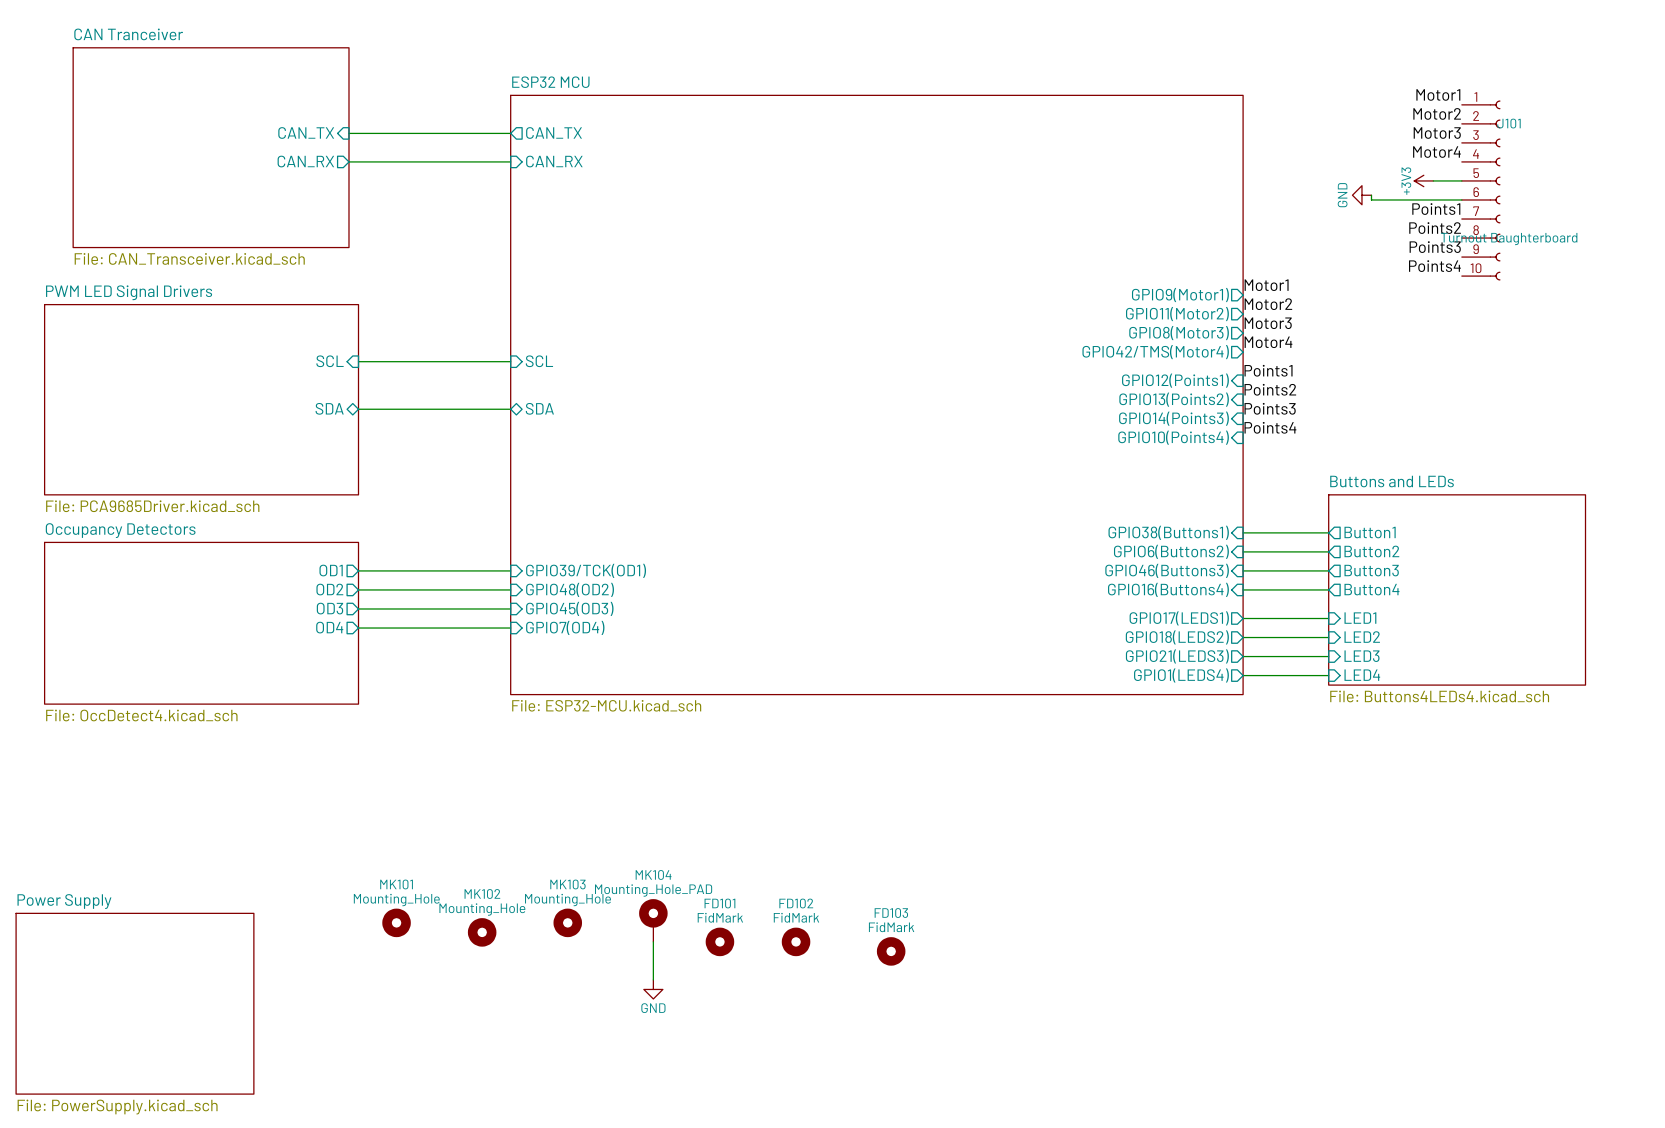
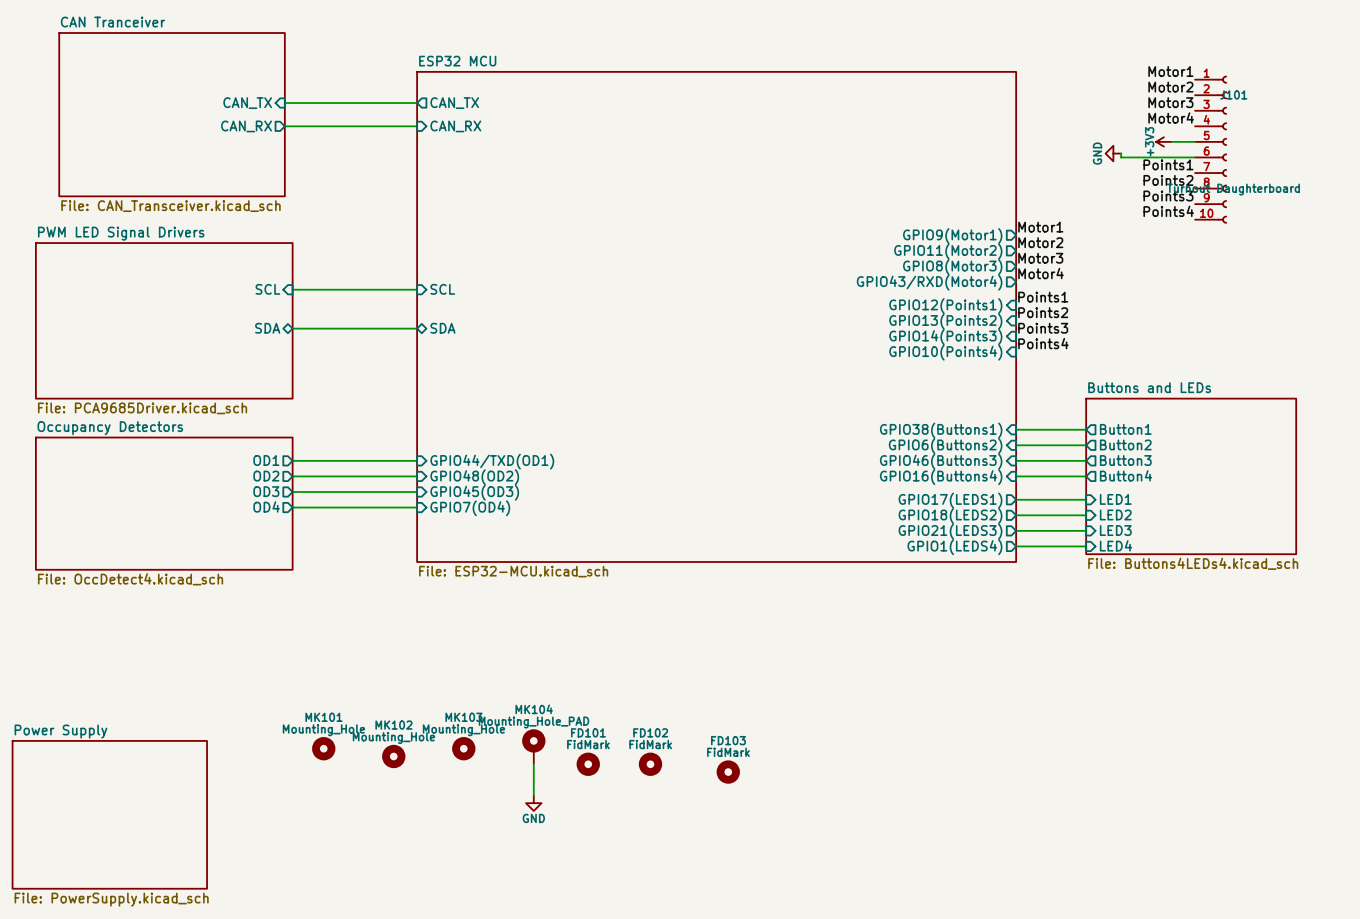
sheet pin: GPIO42/TMS(Motor4) (1155, 352) -> GPIO43/RXD(Motor4) (929, 282)
sheet pin: GPIO39/TCK(OD1) (586, 570) -> GPIO44/TXD(OD1) (492, 461)

